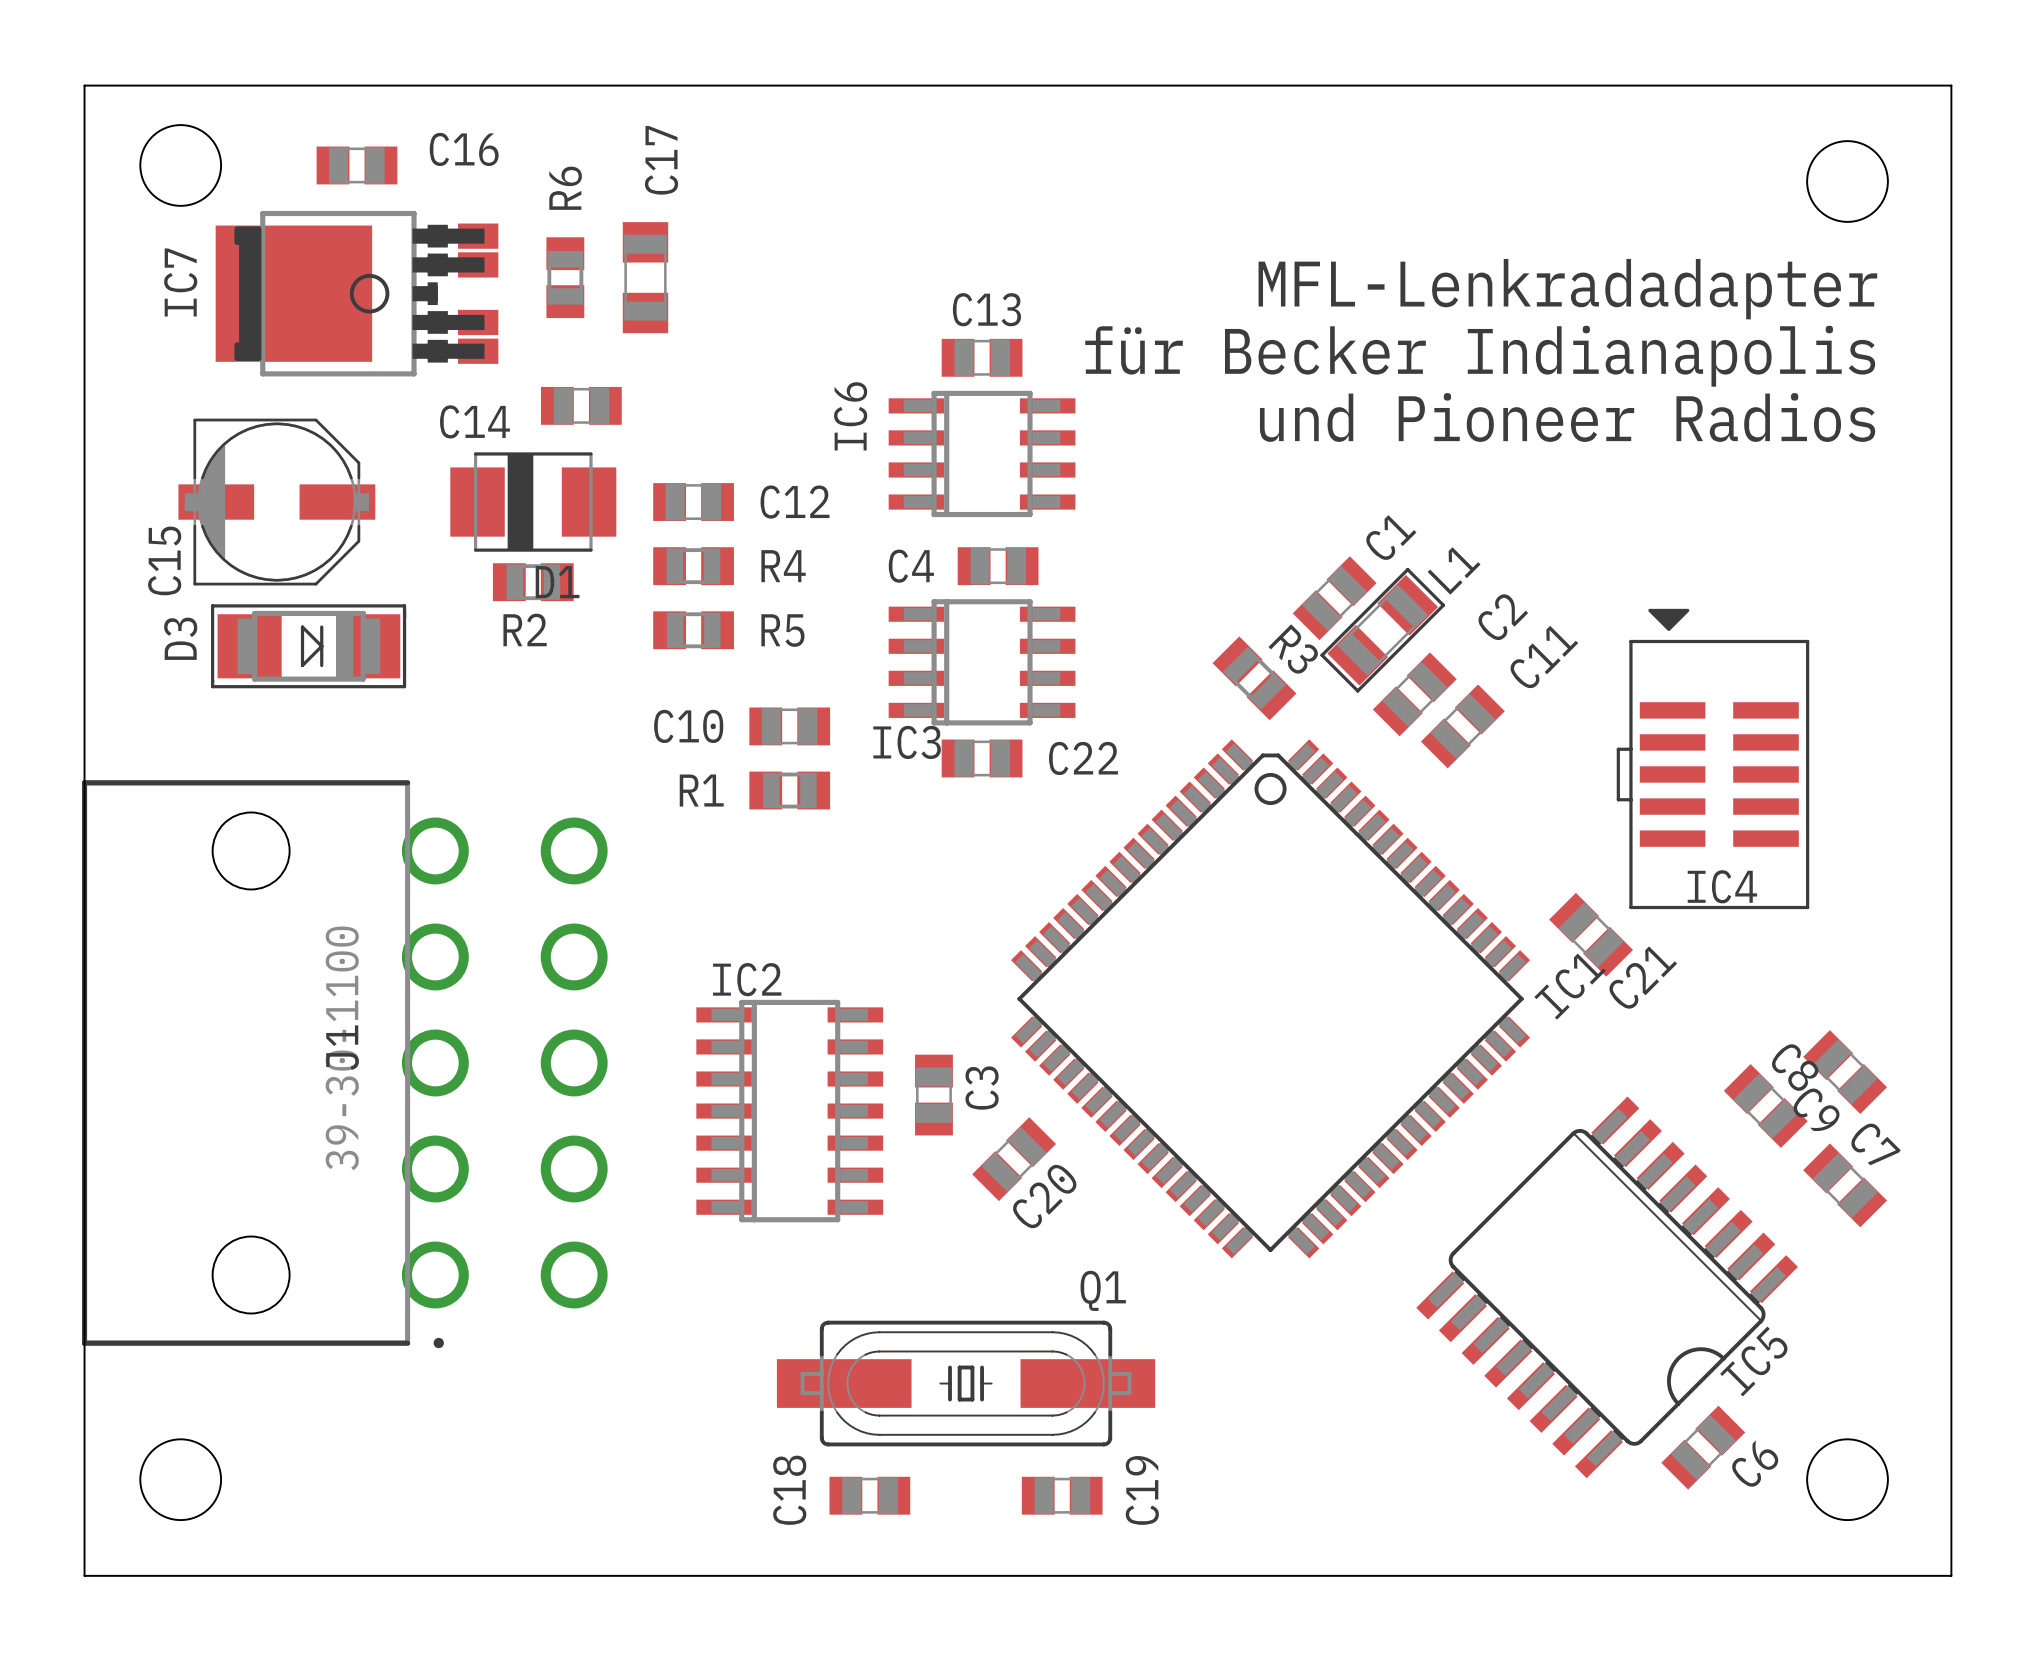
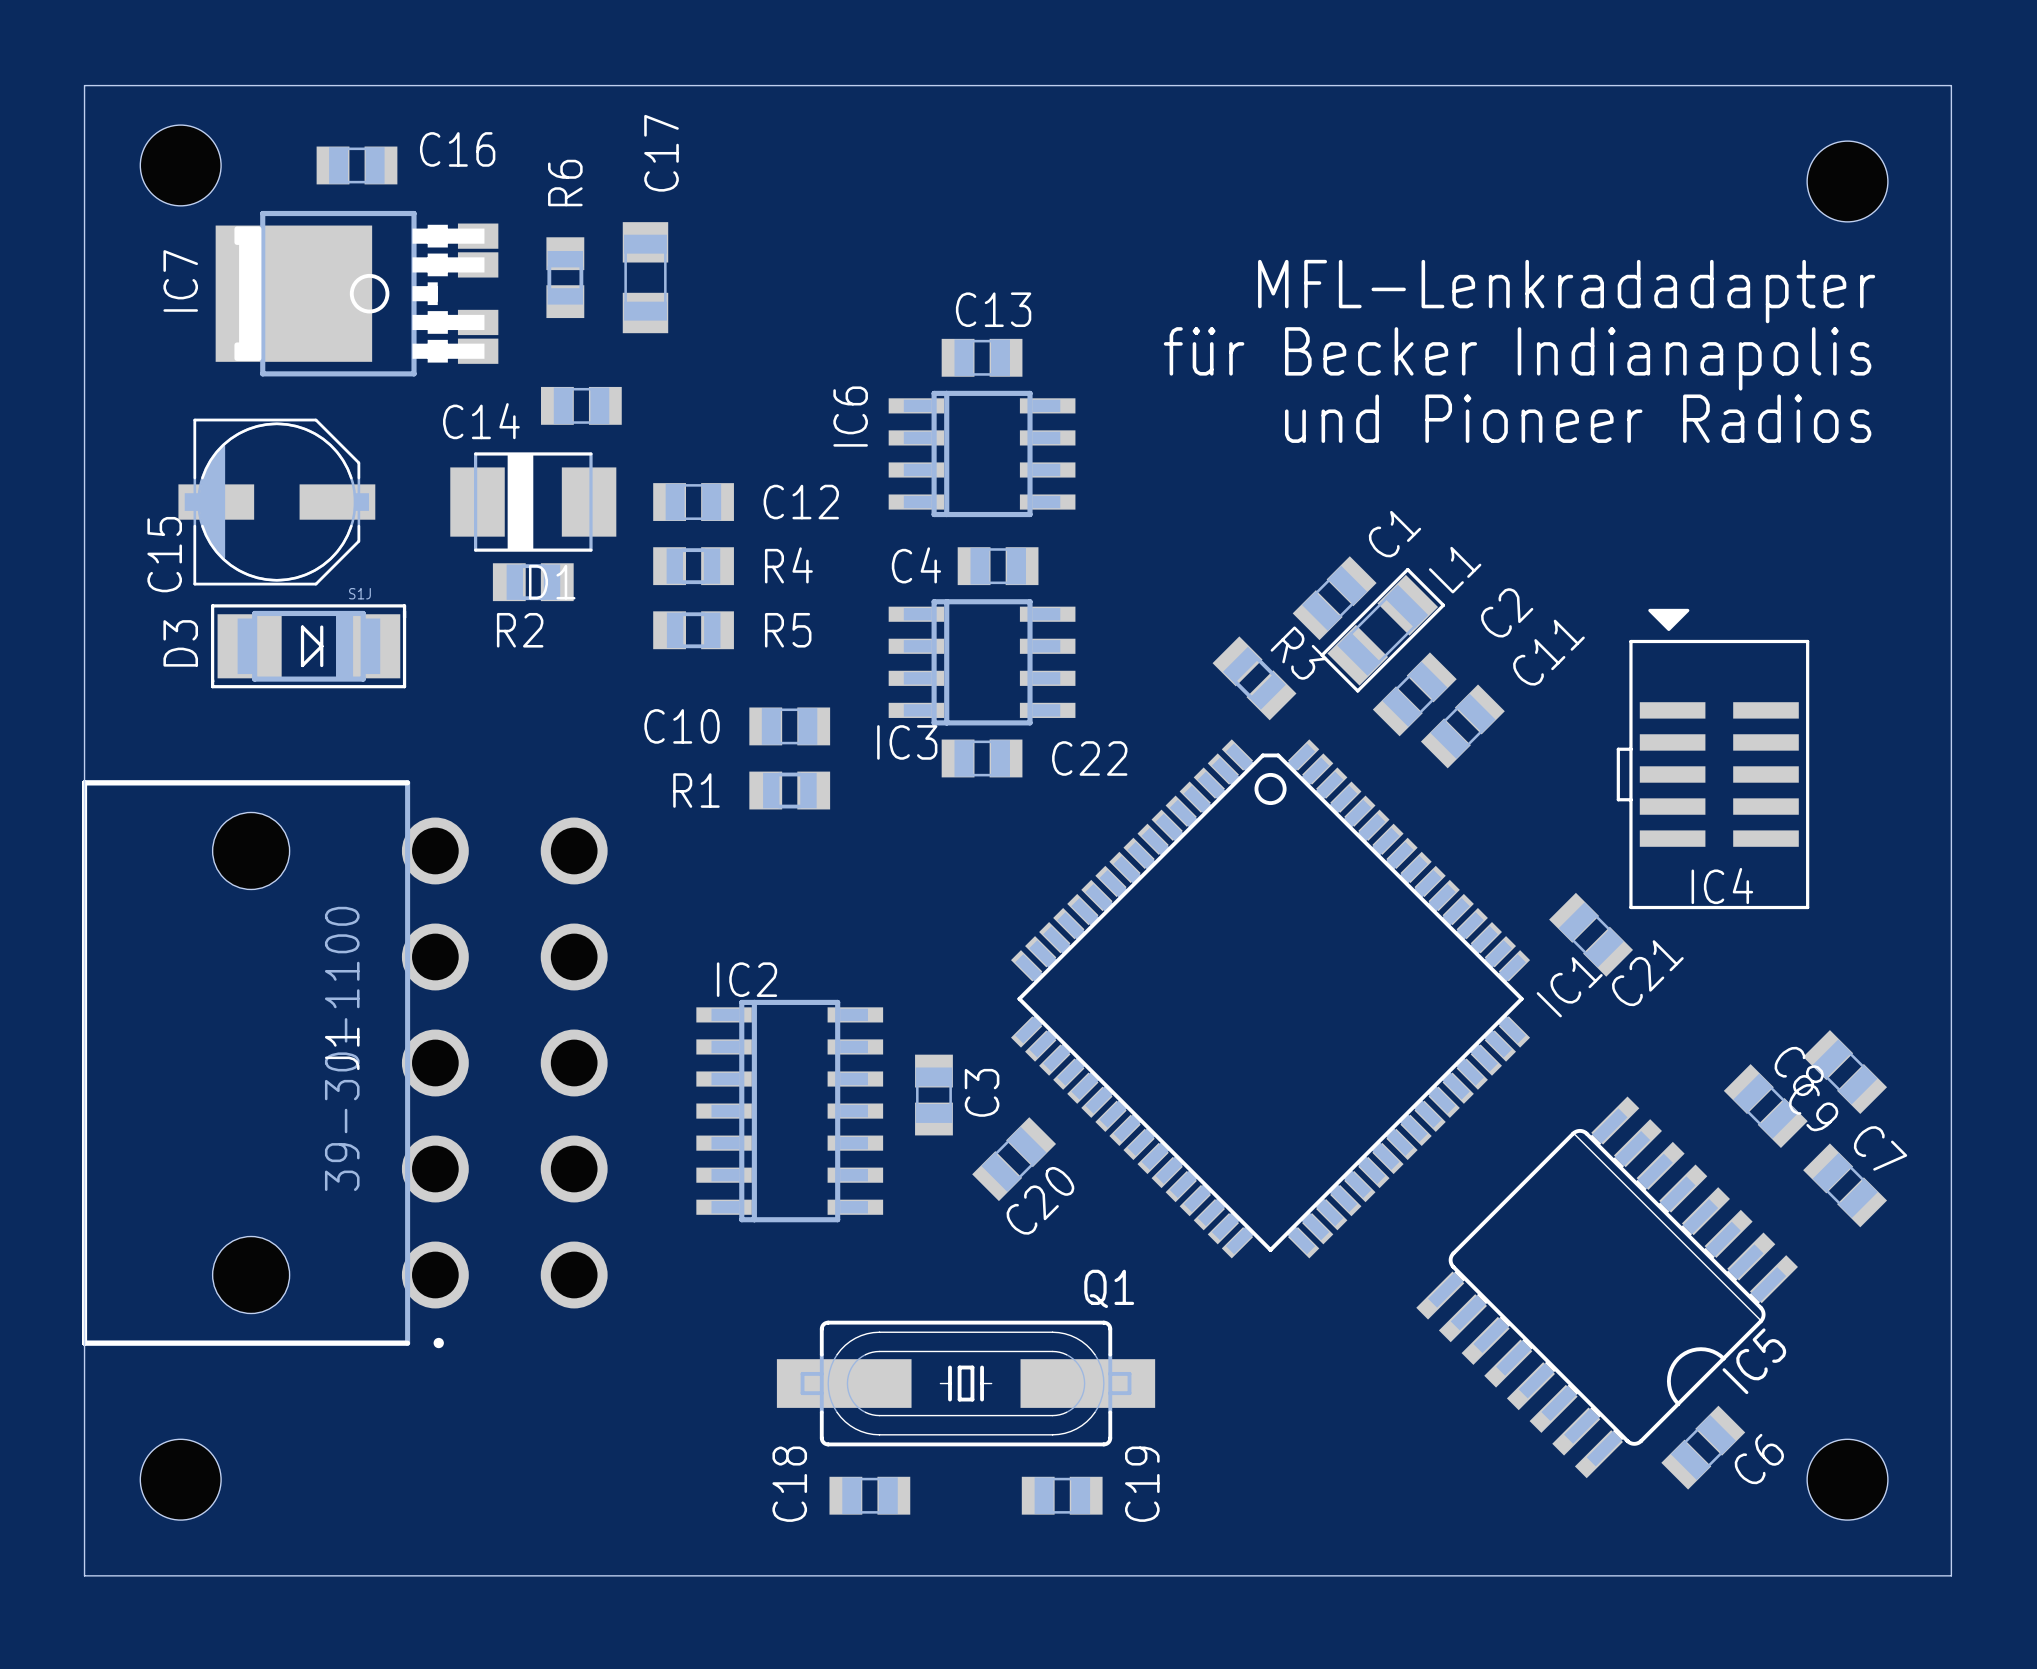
D3 value: none -> S1J (359, 593)

